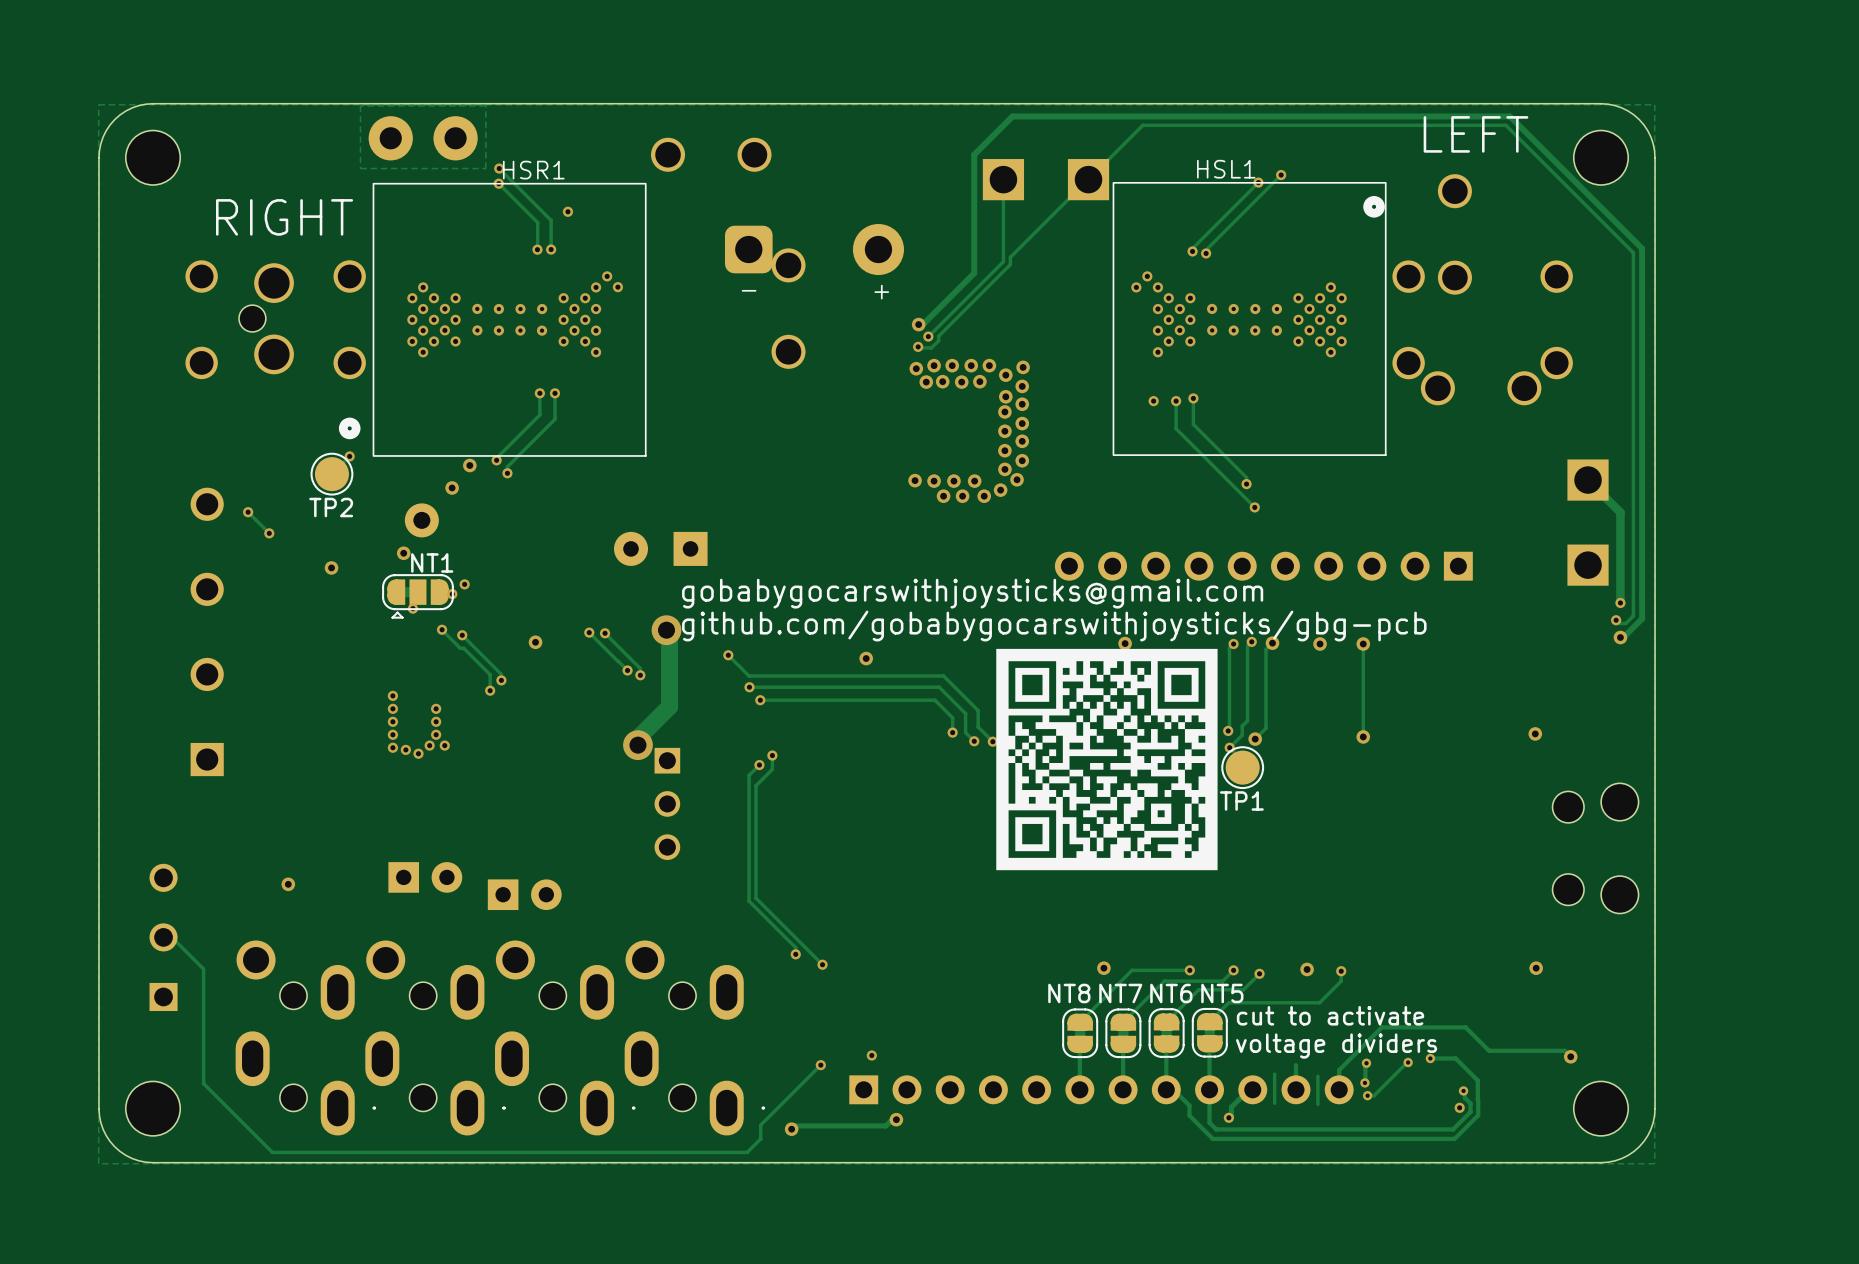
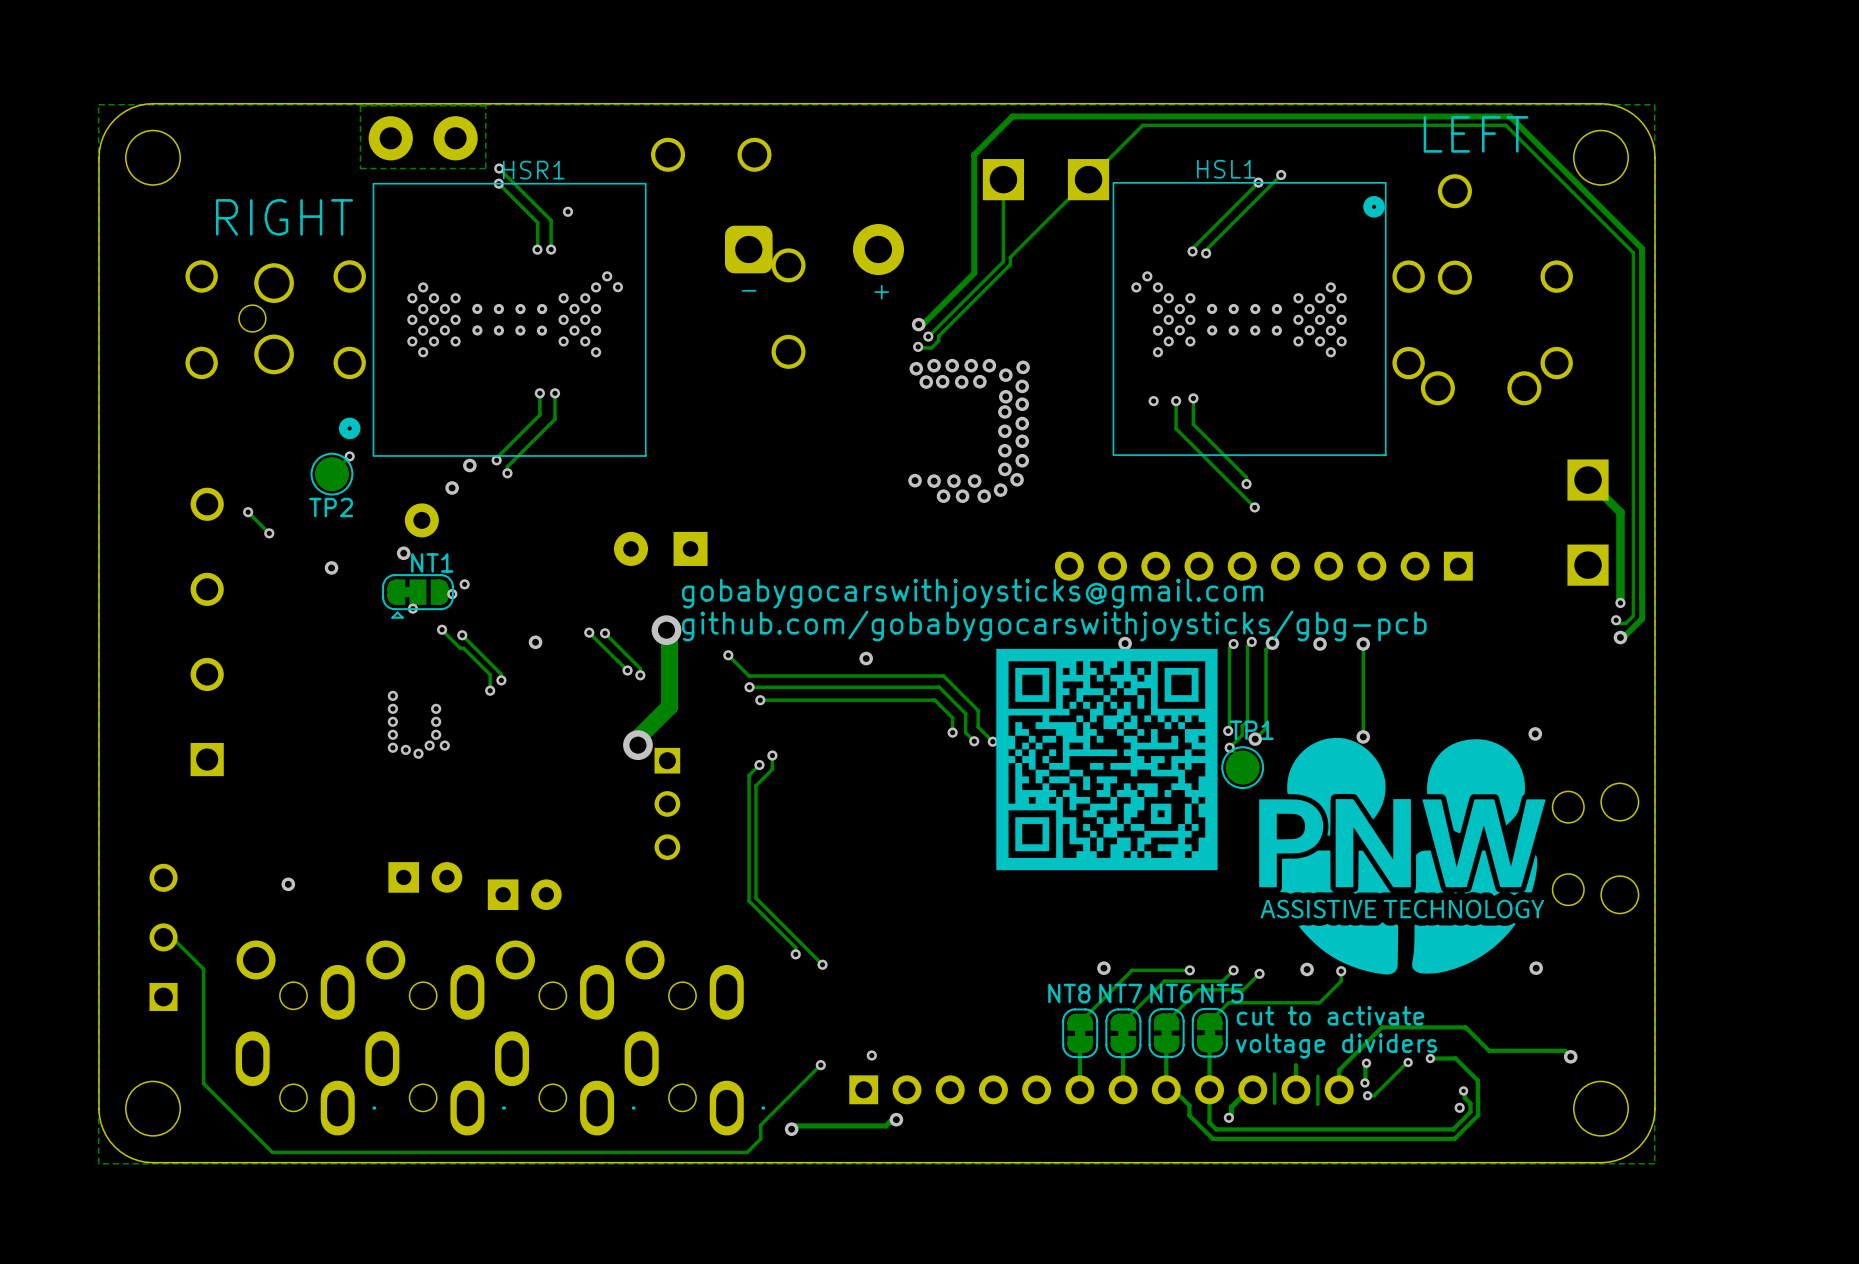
drawing: none -> [1259, 737, 1546, 975]
TP1 name position: TP1 (1241, 800) -> TP1 (1251, 730)

